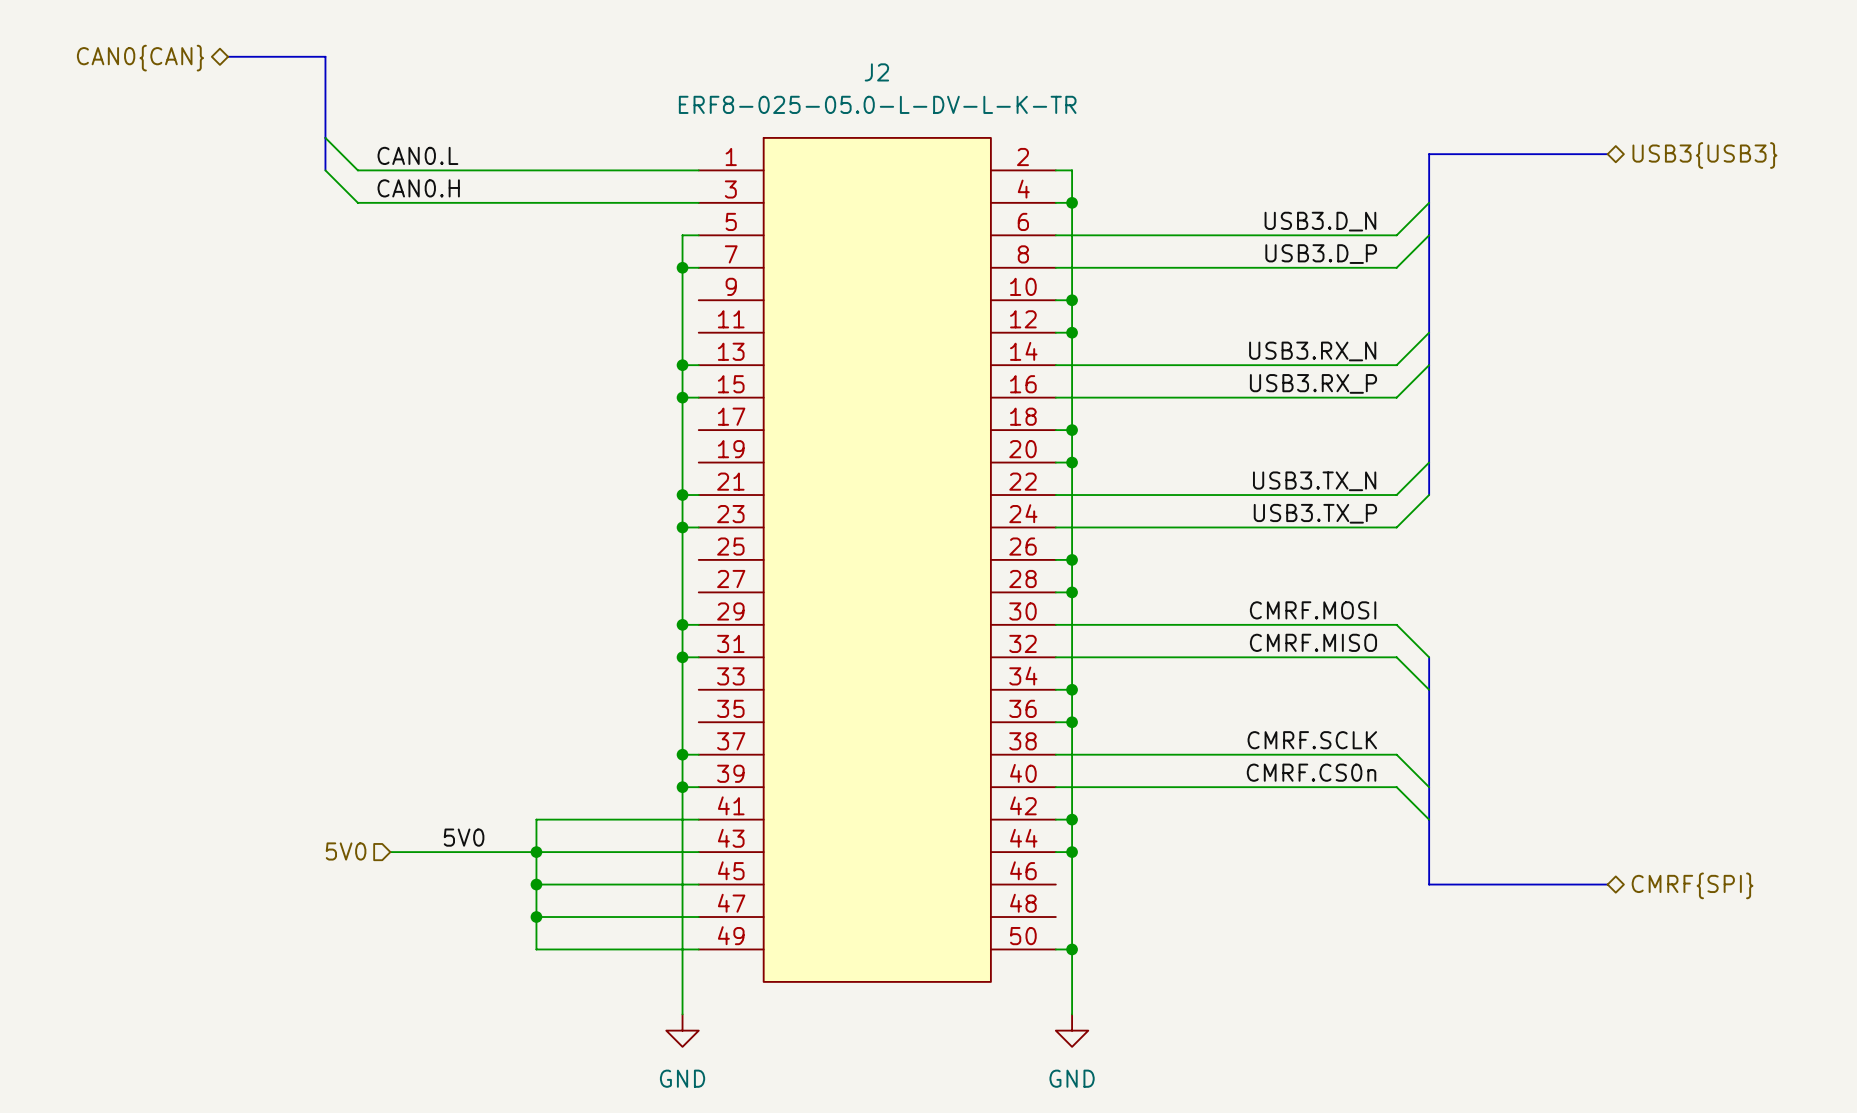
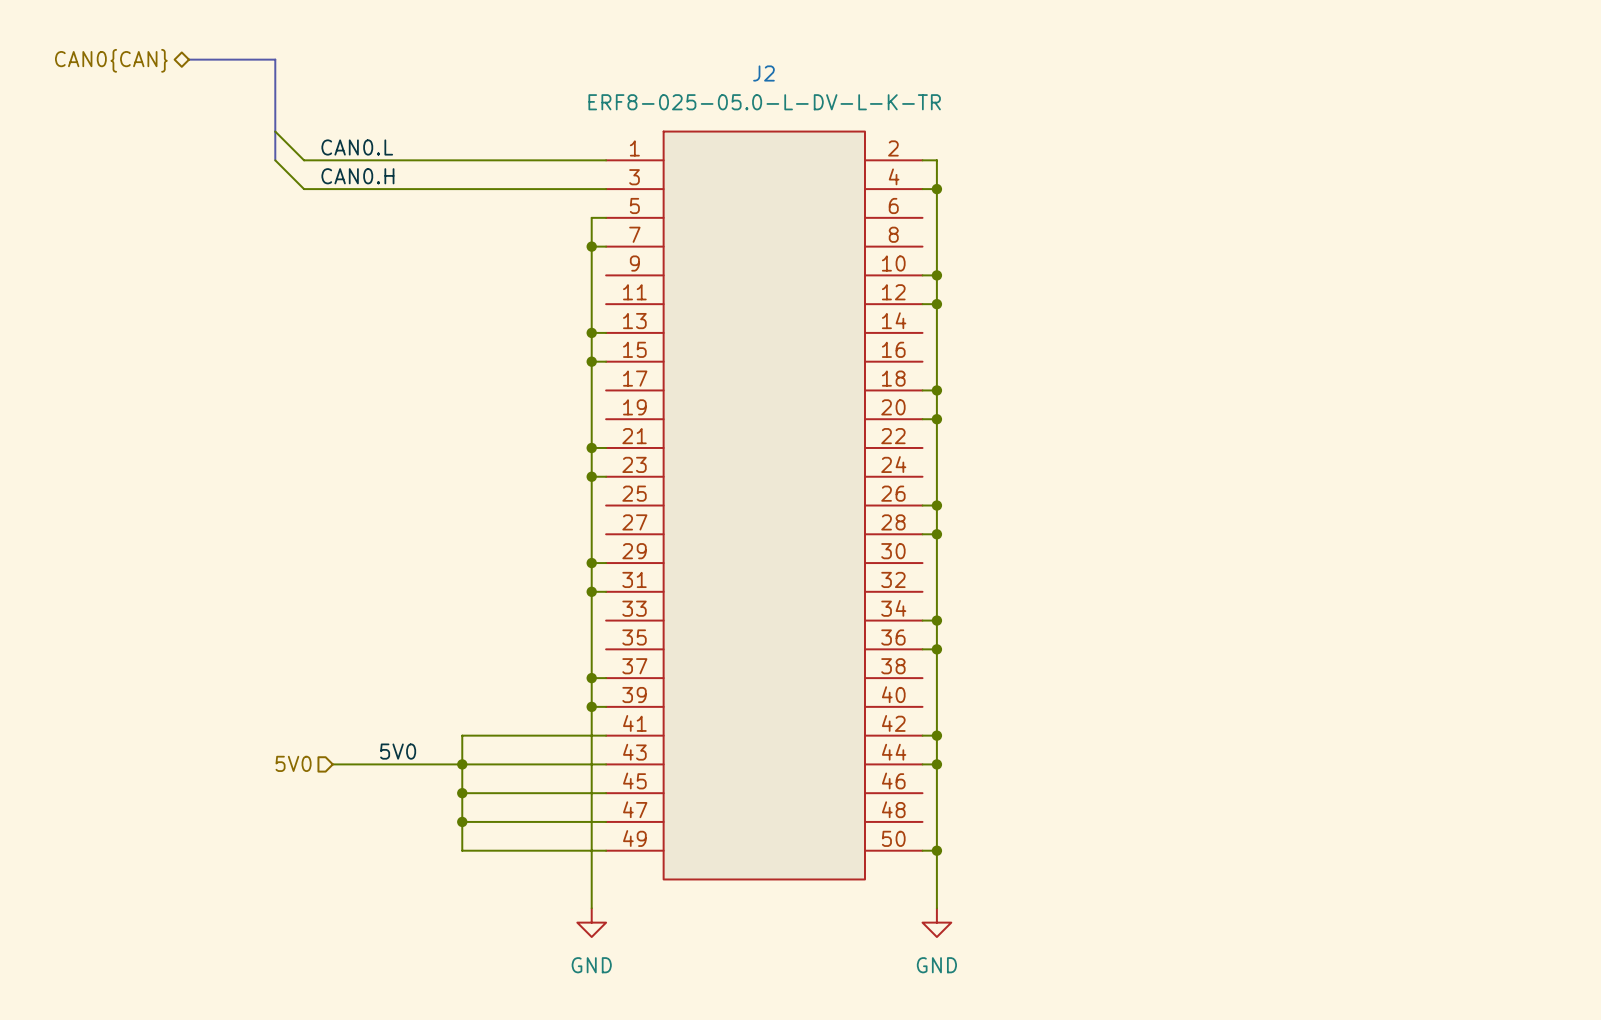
bus: (1607, 154) (1429, 154) (1429, 495) -> none
hierarchical label: USB3{USB3} (1704, 155) -> none
wire: (1429, 202) (1396, 235) (1055, 235) -> none
label: USB3.D_N (1320, 221) -> none
wire: (1429, 235) (1396, 267) (1055, 267) -> none
label: USB3.D_P (1321, 254) -> none
wire: (1429, 332) (1396, 365) (1055, 365) -> none
label: USB3.RX_N (1312, 351) -> none
wire: (1429, 365) (1396, 397) (1055, 397) -> none
label: USB3.RX_P (1313, 383) -> none
wire: (1429, 462) (1396, 495) (1055, 495) -> none
label: USB3.TX_N (1314, 481) -> none
wire: (1429, 495) (1396, 527) (1055, 527) -> none
label: USB3.TX_P (1315, 513) -> none
label: CMRF.MOSI (1313, 610) -> none
wire: (1055, 624) (1396, 624) (1429, 657) -> none
label: CMRF.MISO (1313, 642) -> none
wire: (1055, 657) (1396, 657) (1429, 689) -> none
bus: (1429, 657) (1429, 884) (1607, 884) -> none
label: CMRF.SCLK (1312, 740) -> none
wire: (1055, 754) (1396, 754) (1429, 787) -> none
label: CMRF.CS0n (1311, 772) -> none
wire: (1055, 787) (1396, 787) (1429, 819) -> none
hierarchical label: CMRF{SPI} (1692, 885) -> none

